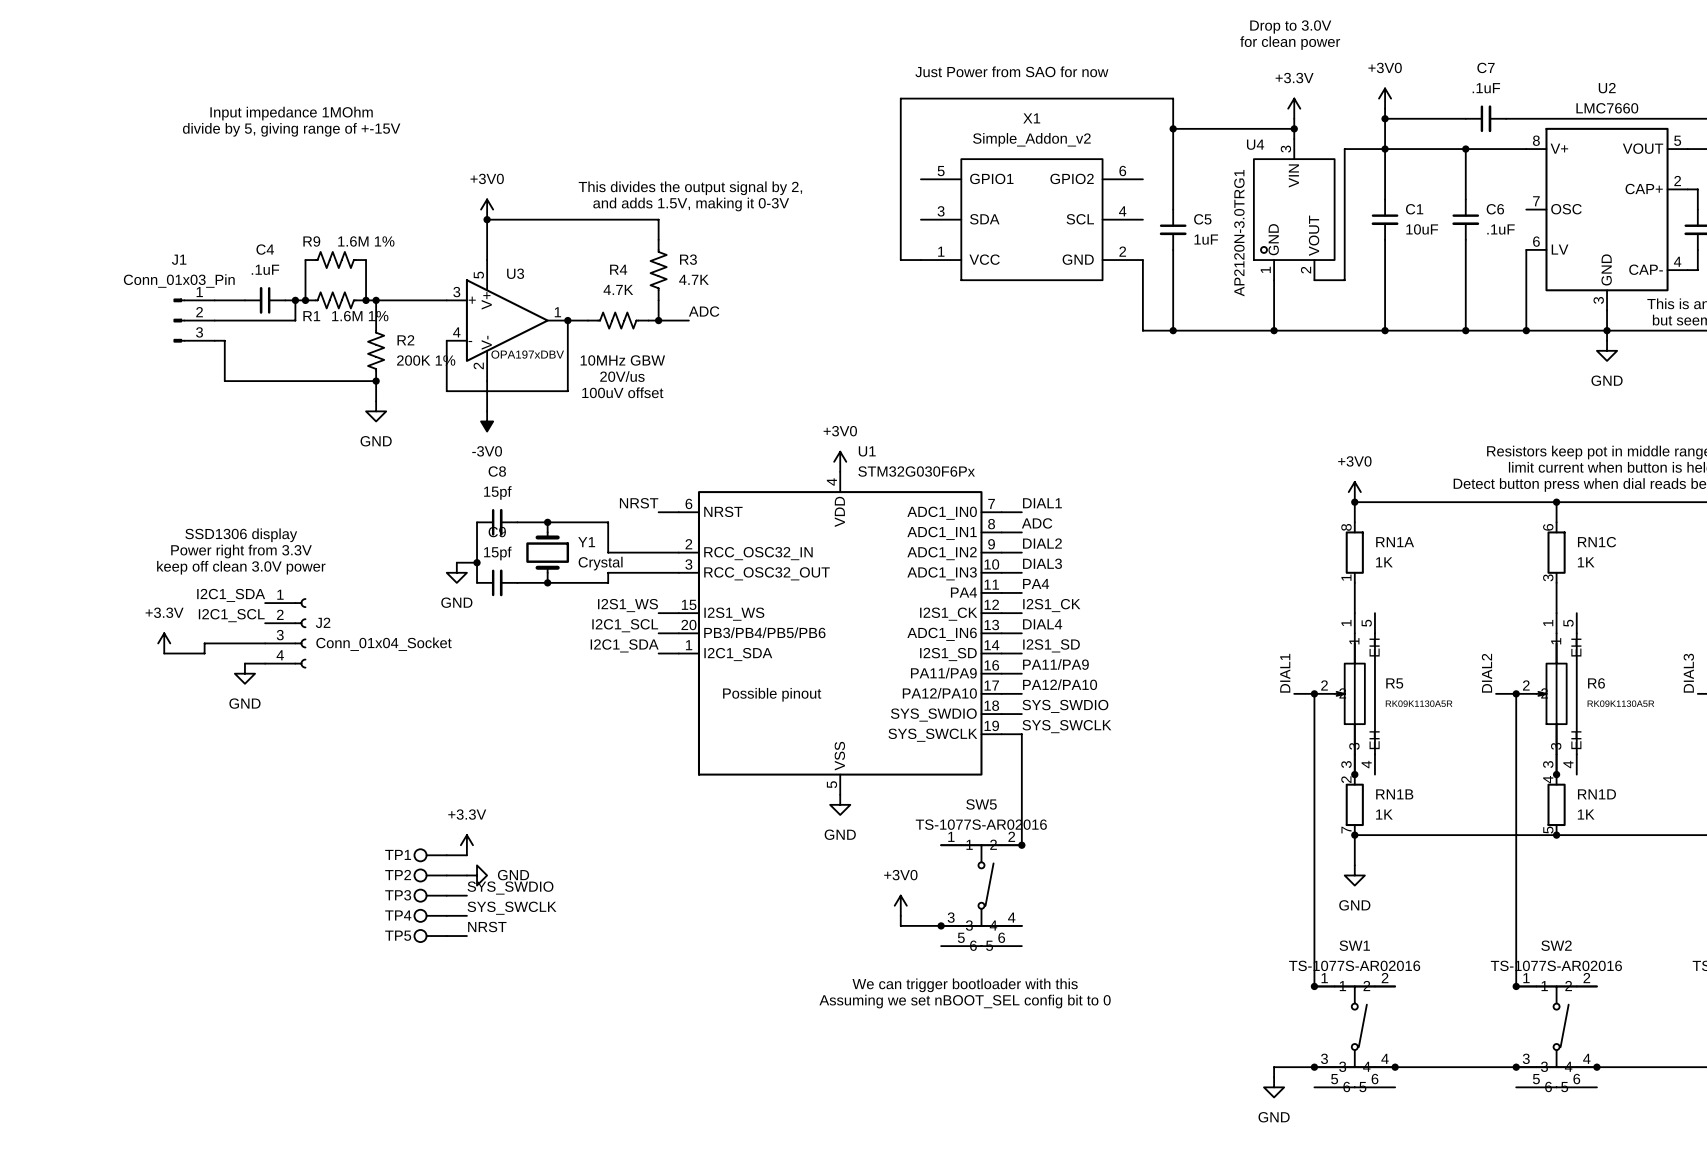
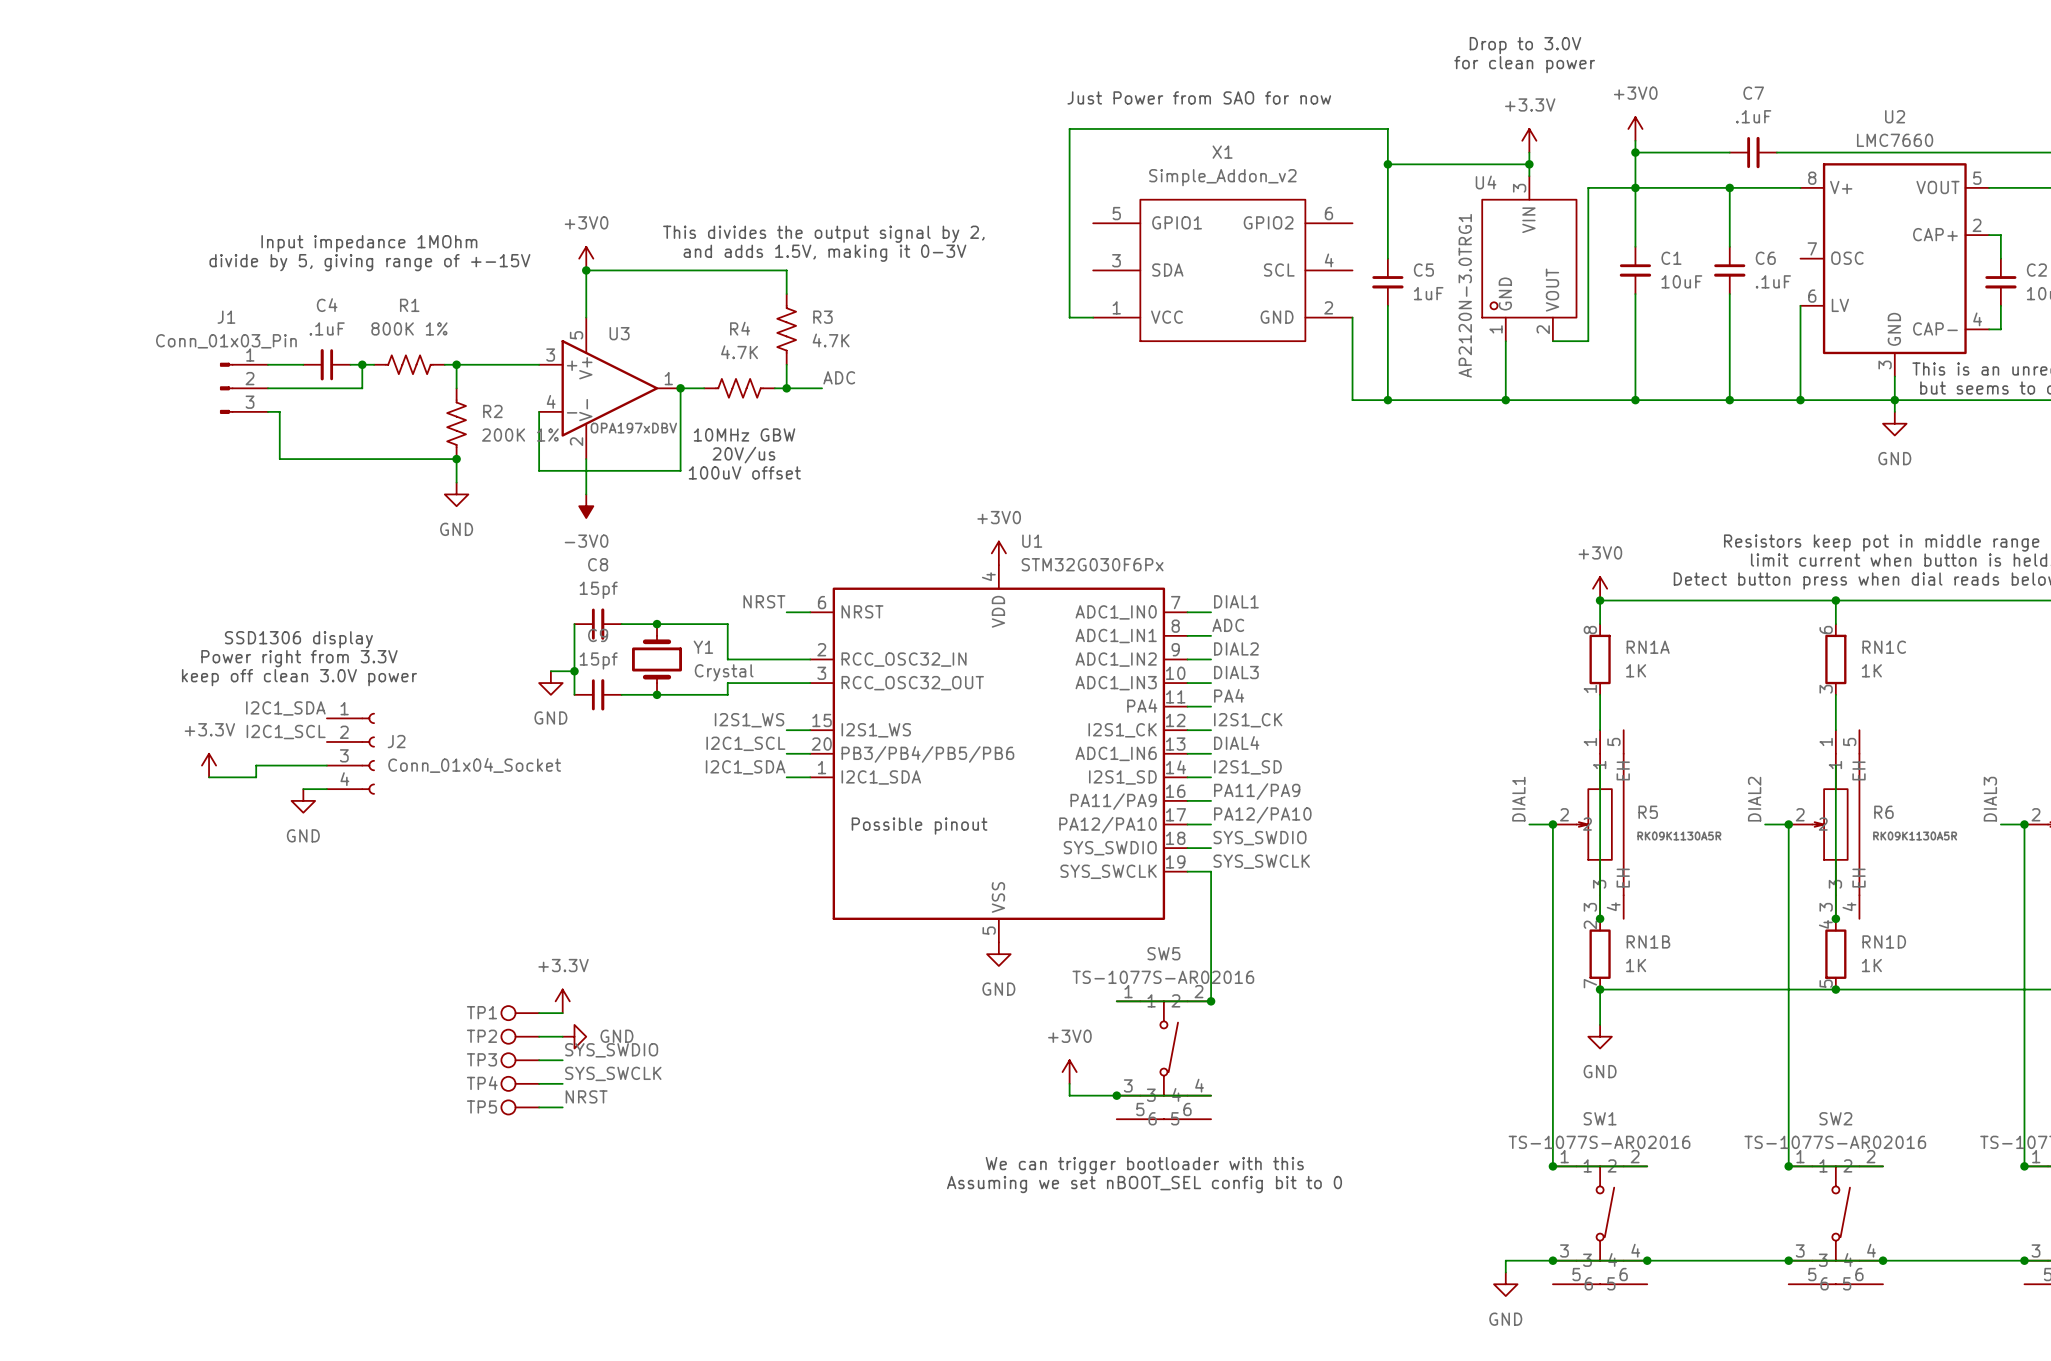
text position: Input impedance 1MOhm (291, 113) -> Input impedance 1MOhm (369, 243)
text position: divide by 5, giving range of +-15V (291, 129) -> divide by 5, giving range of +-15V (369, 262)
wire: (305, 260) (305, 300) -> none
R9: 1.6M 1% (335, 260) -> none
wire: (366, 260) (366, 300) -> none
junction: (305, 300) -> none
junction: (366, 300) -> none
R1 name position: R1 (311, 316) -> R1 (409, 305)
R1 value: 1.6M 1% (360, 316) -> 800K 1% (409, 328)

